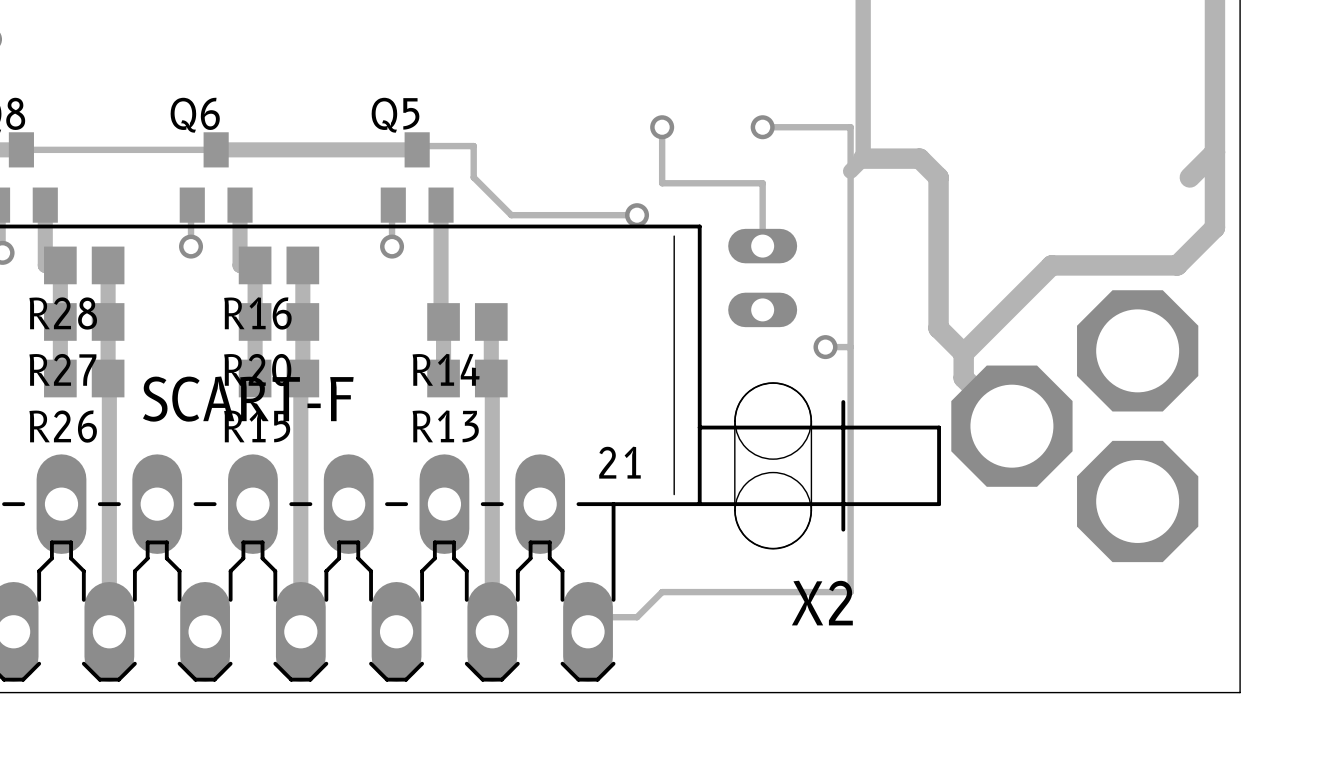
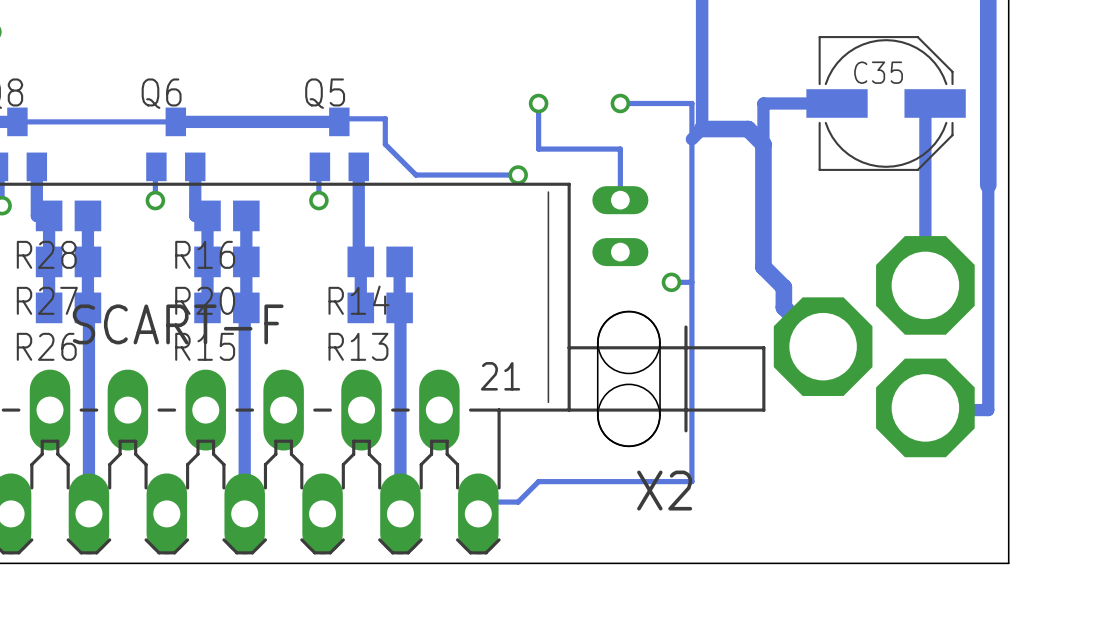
track: none -> (837, 103) (763, 103) (763, 144)
C35: none -> (886, 103)
track: none -> (935, 103) (925, 103) (925, 285)
track: (1214, 152) (1189, 177) -> none
track: (1214, 227) (1177, 265) (1051, 265) (963, 353) -> (988, 185) (988, 410) (925, 410) (925, 407)

